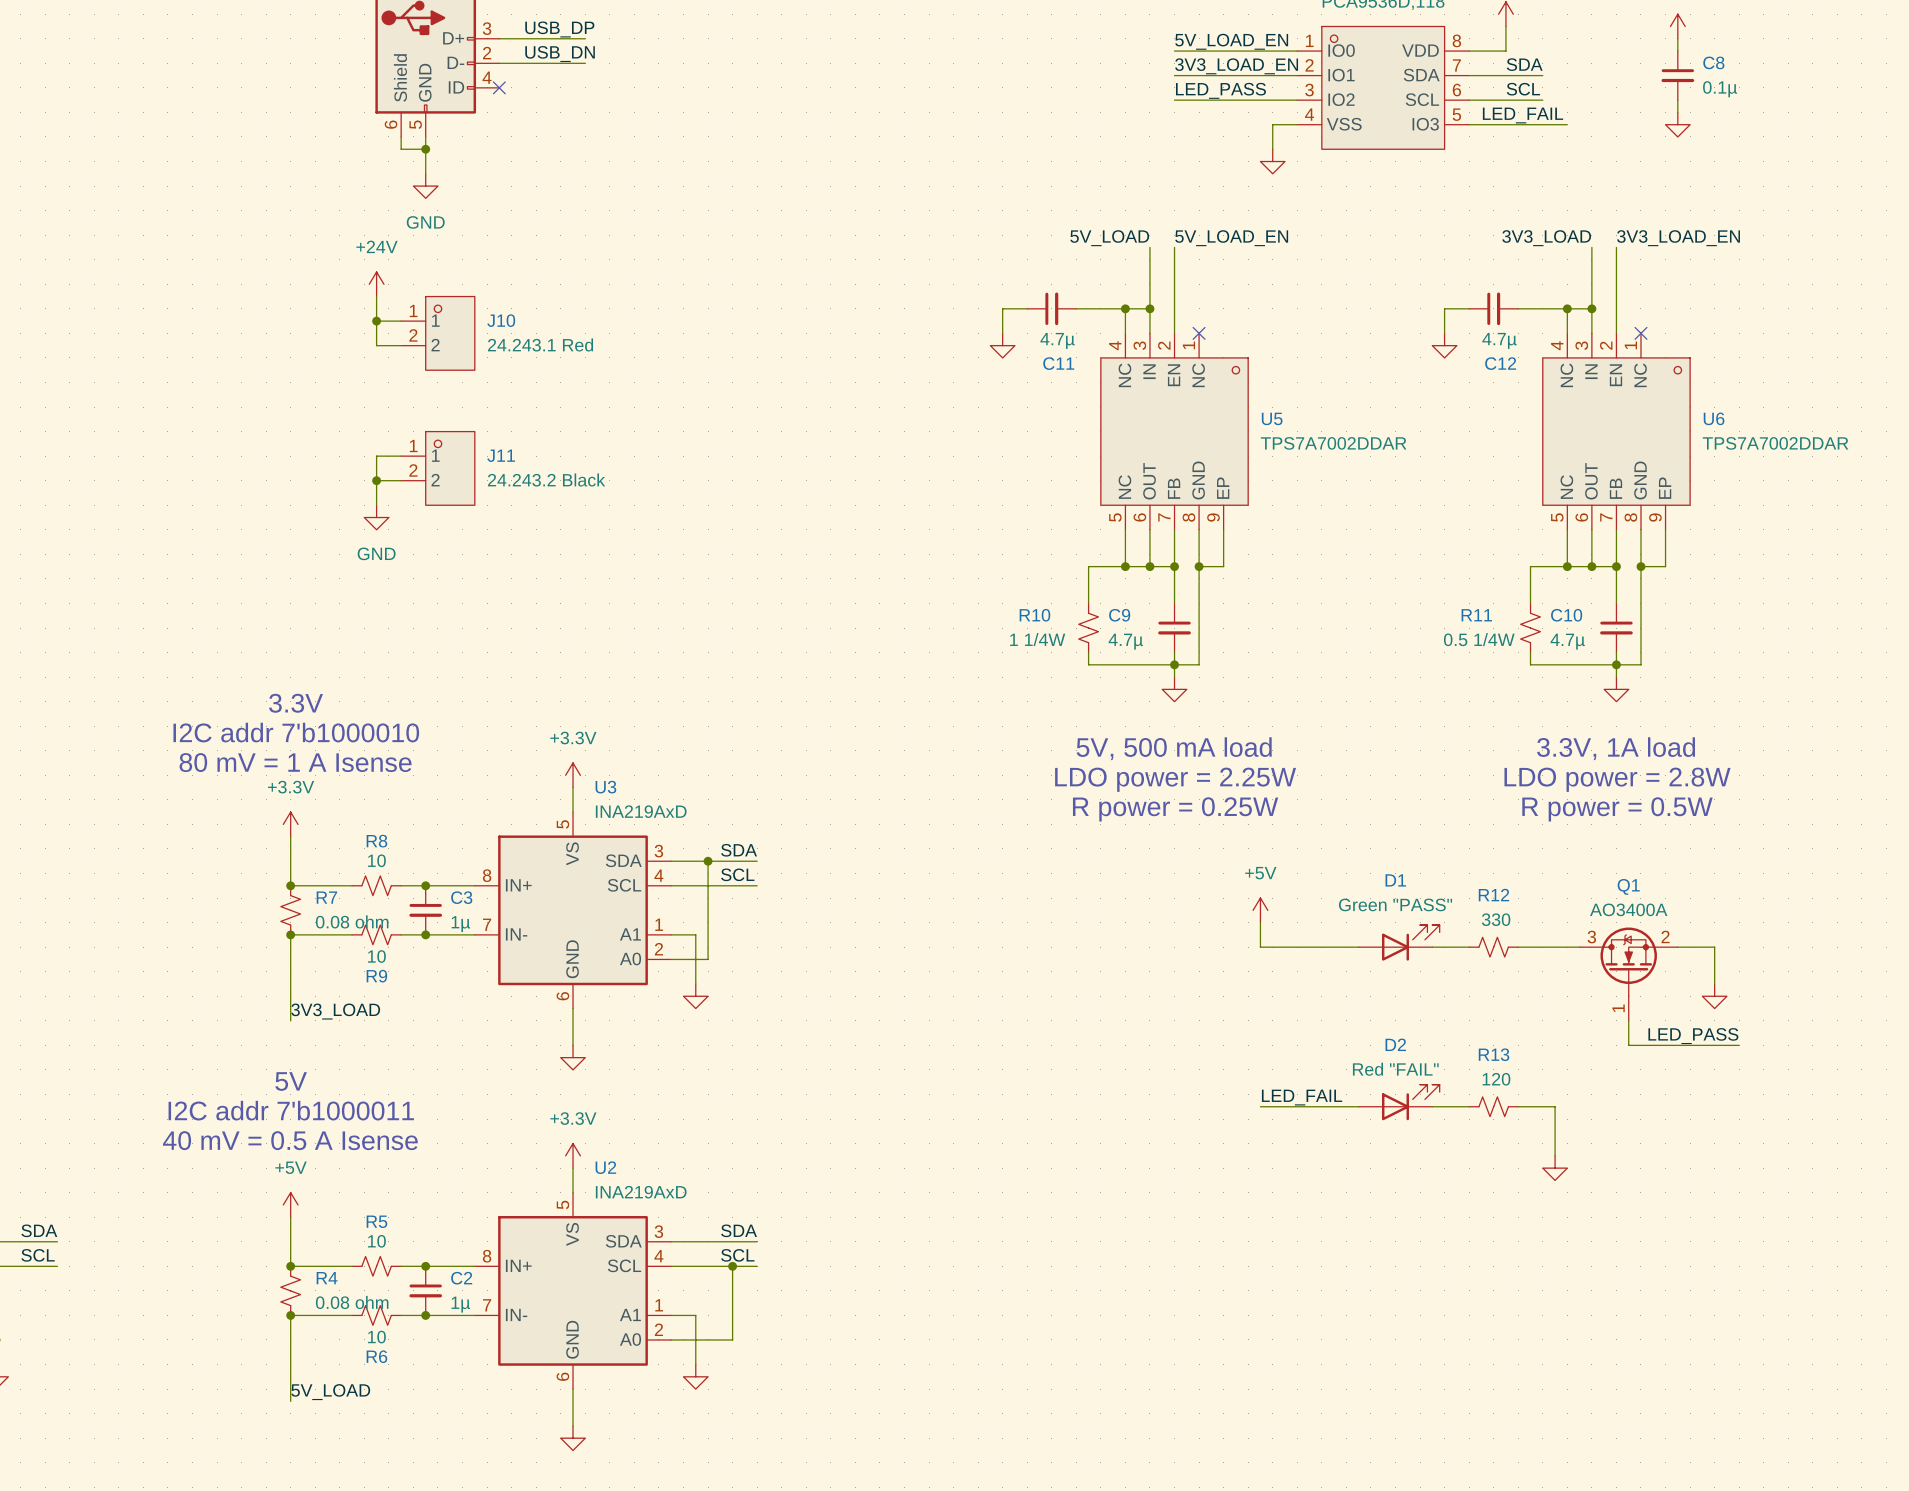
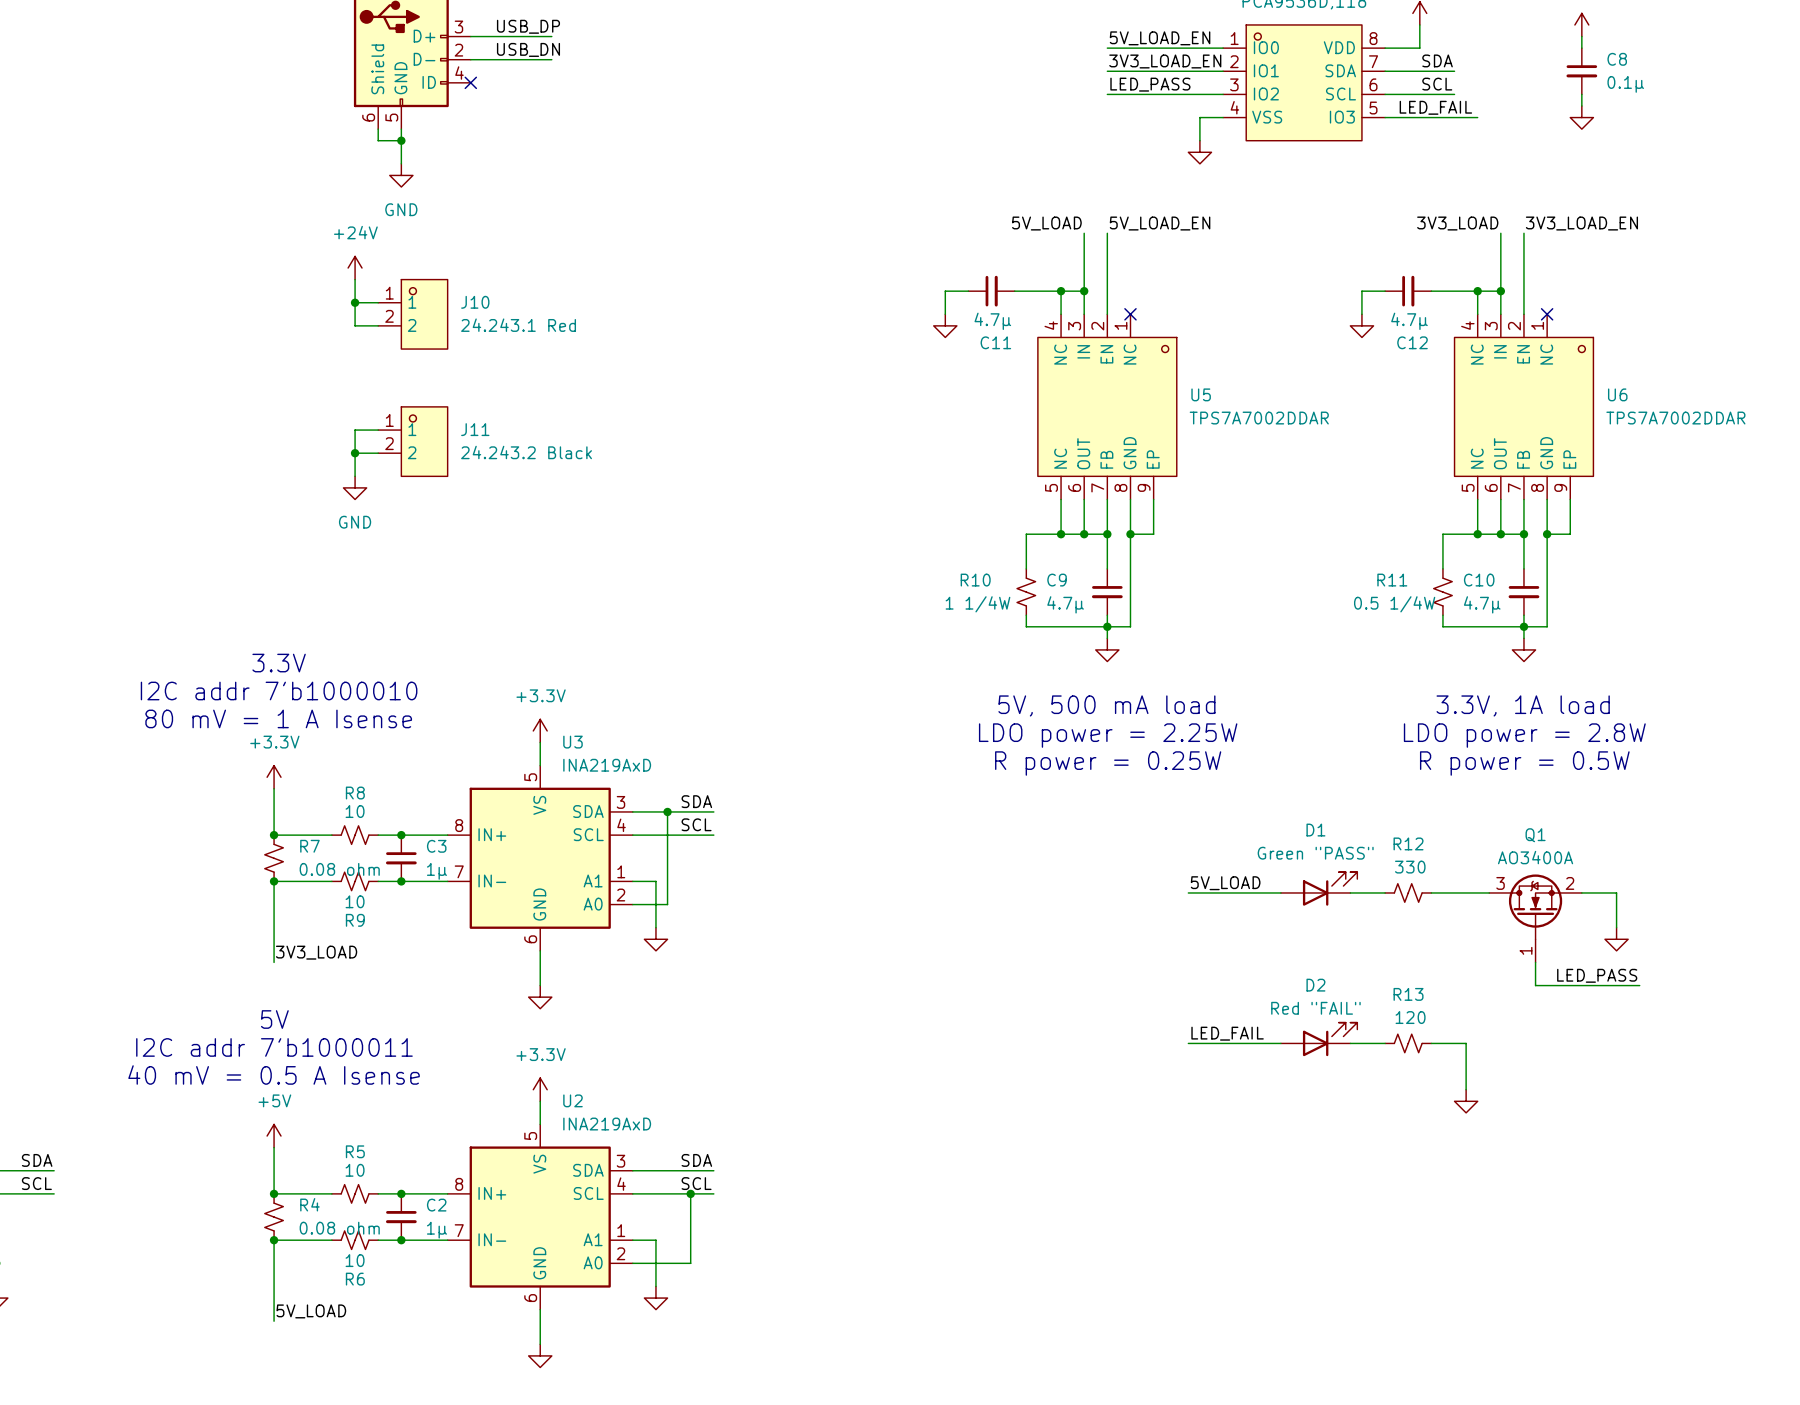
power symbol: +5V (1260, 910) -> none
wire: (1260, 922) (1260, 947) -> none
label: none -> 5V_LOAD (1225, 883)

